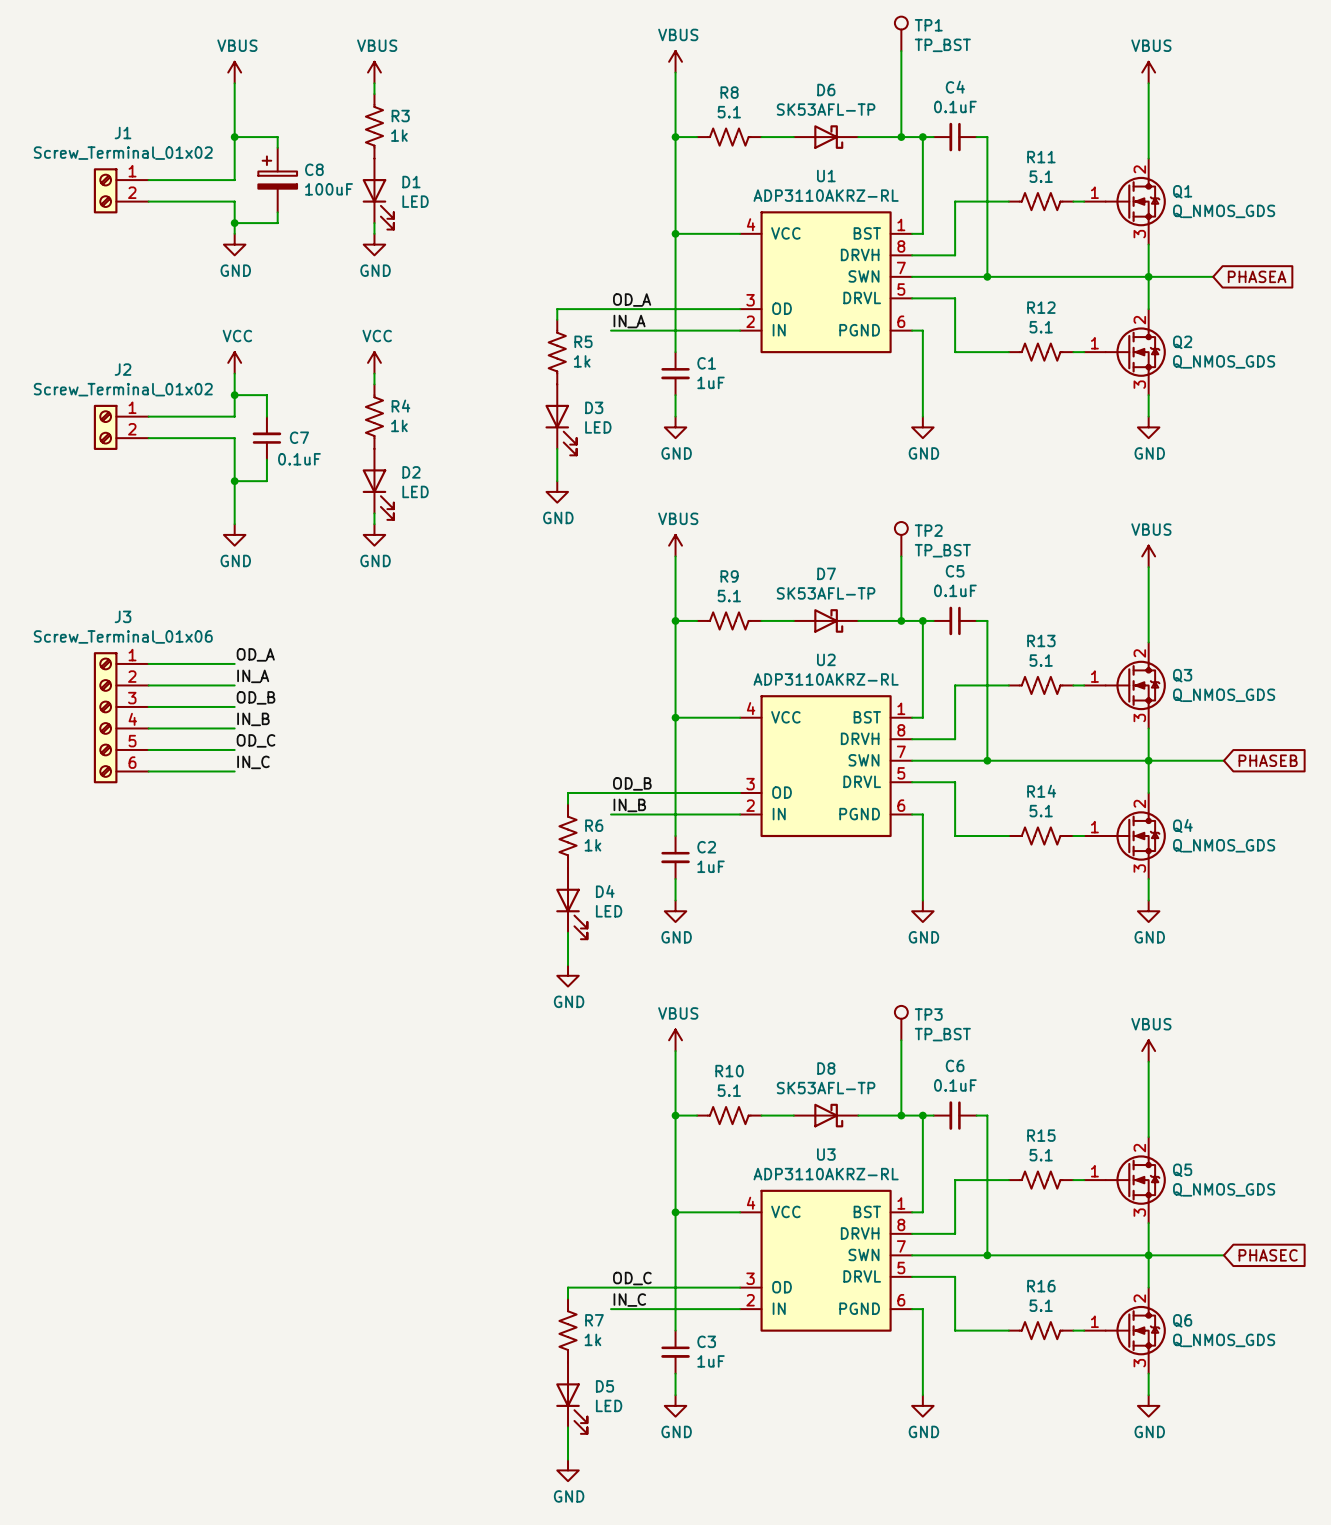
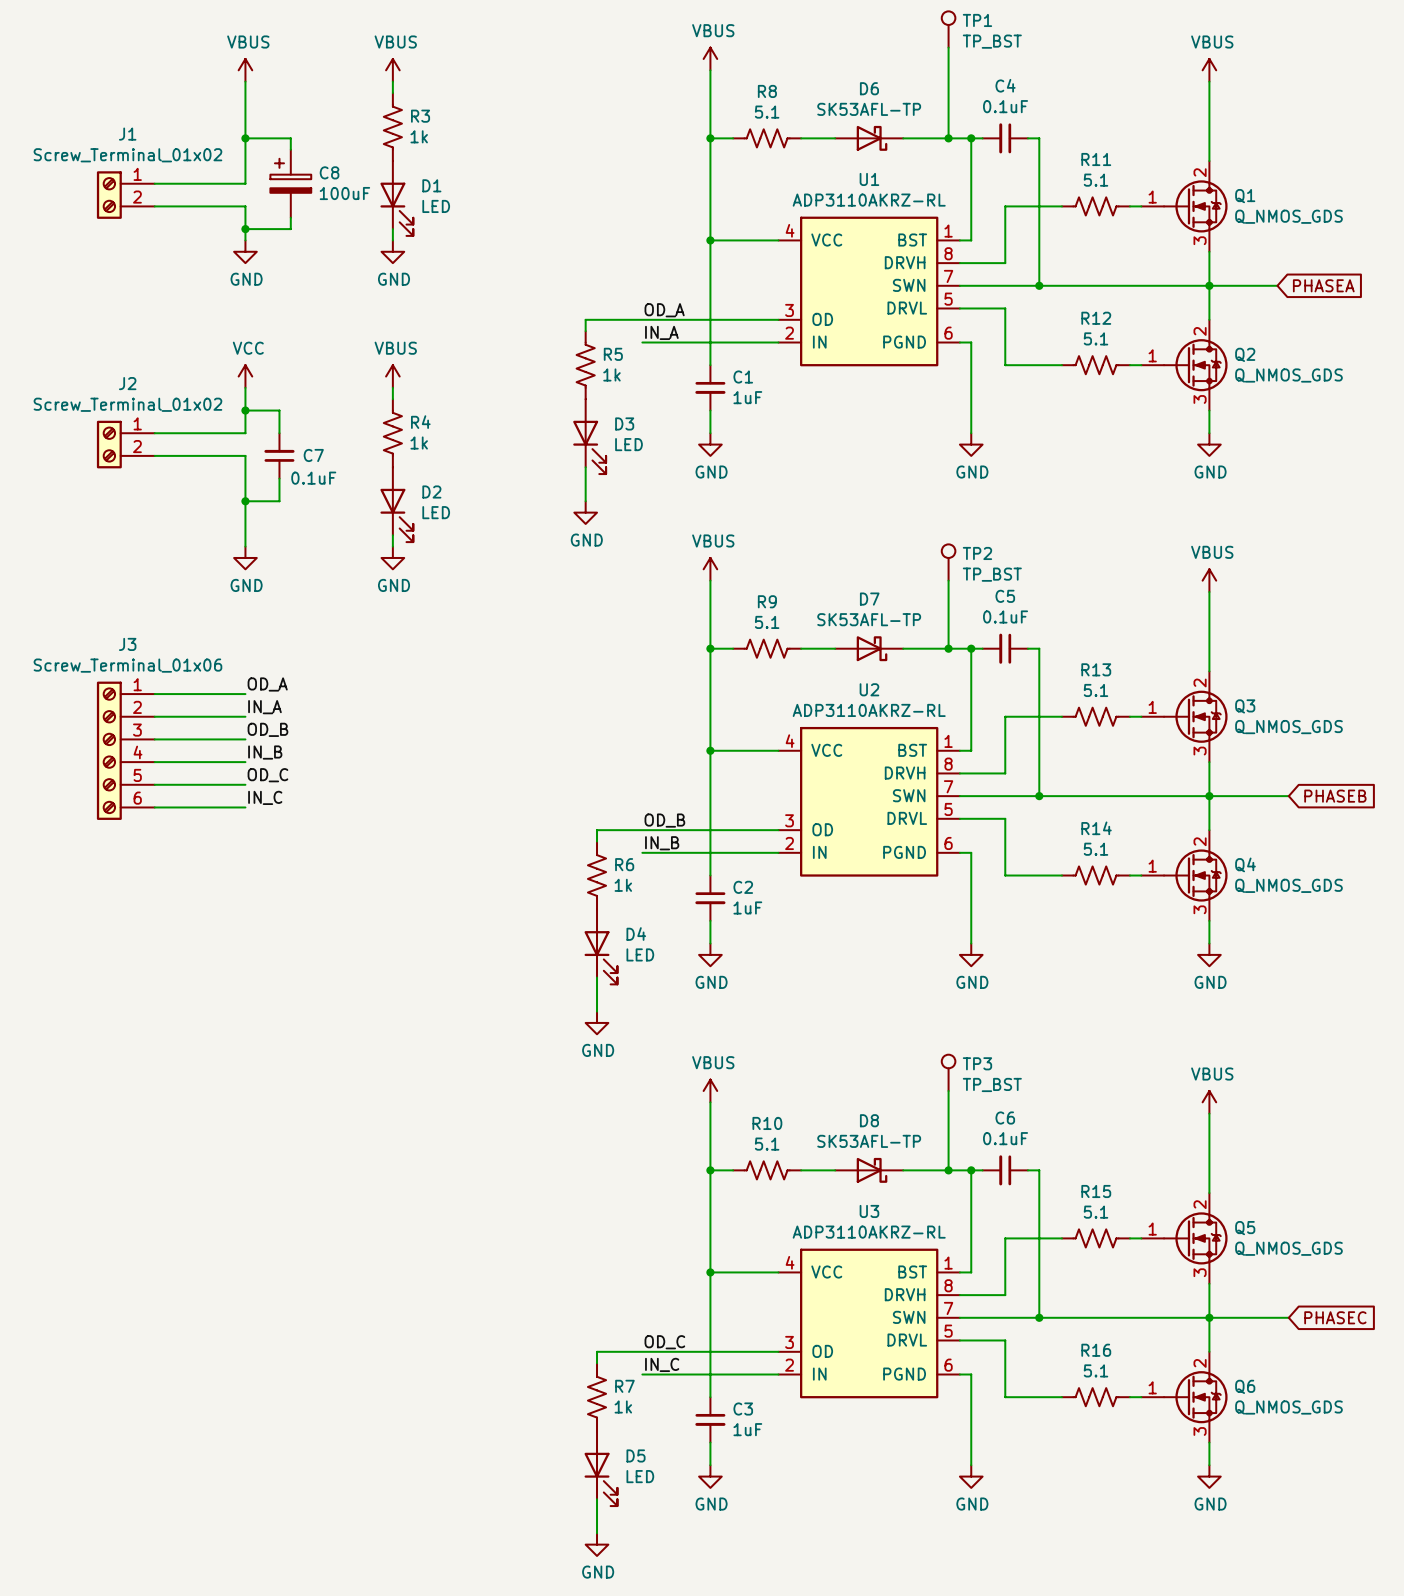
power symbol: VCC (374, 362) -> VBUS (392, 376)

